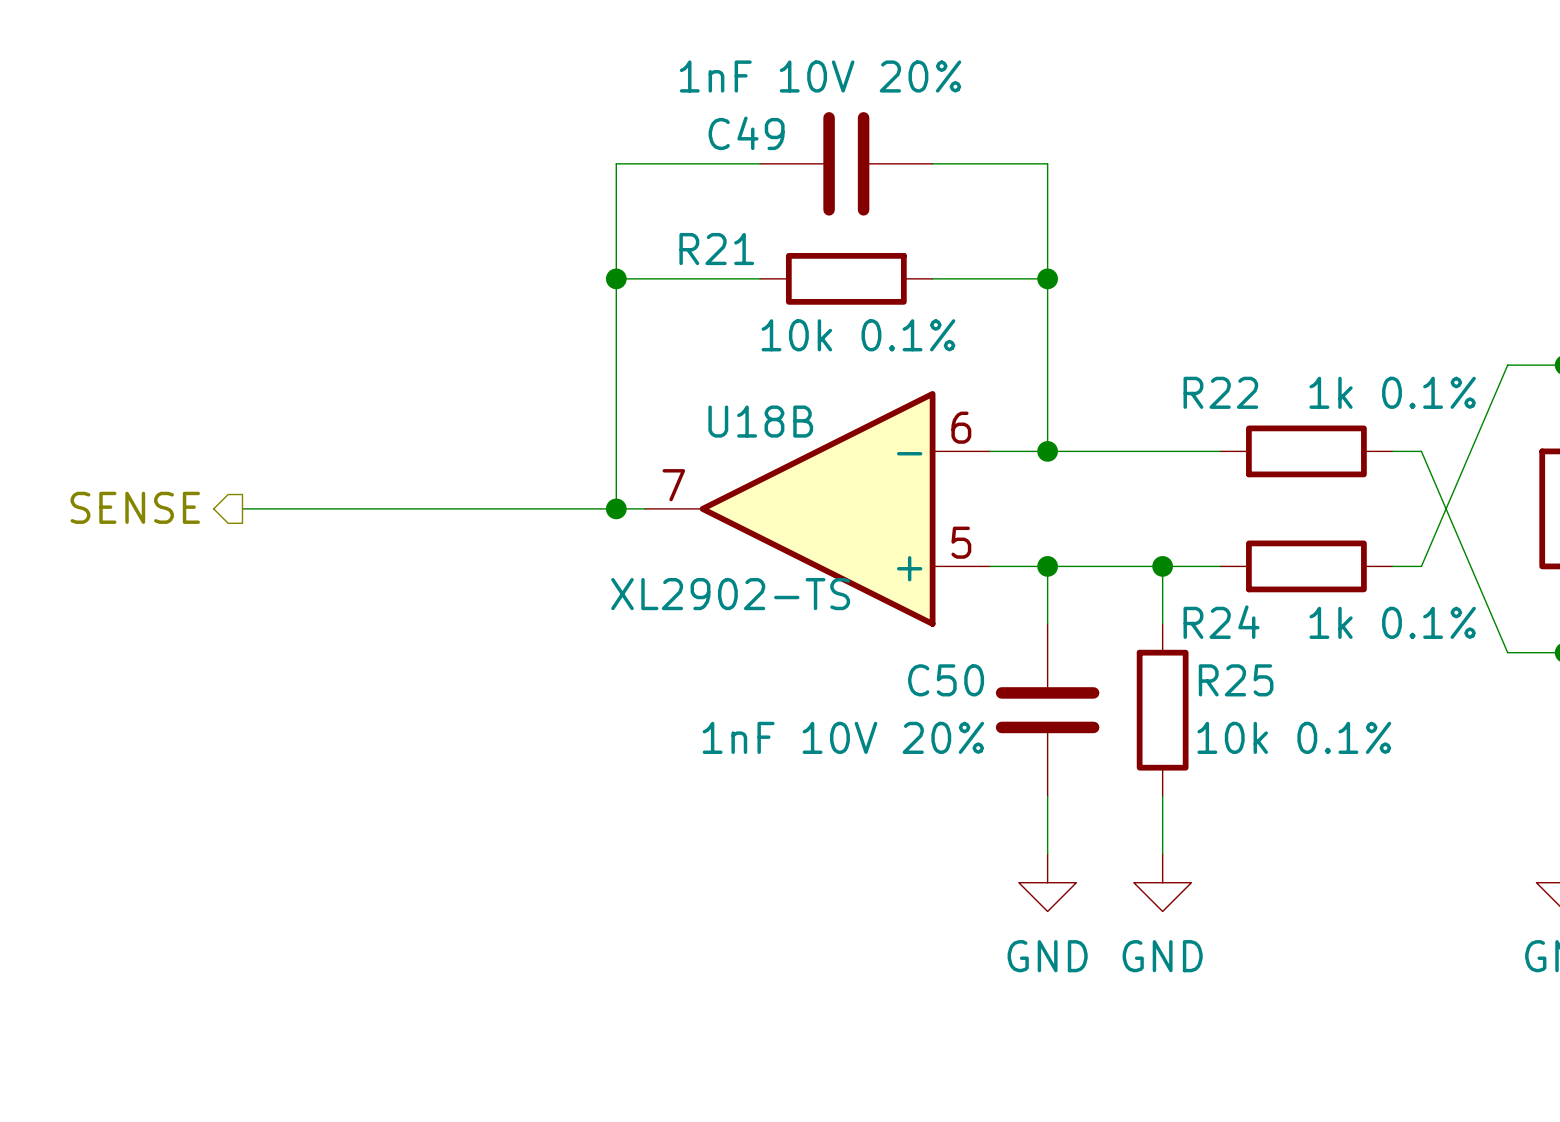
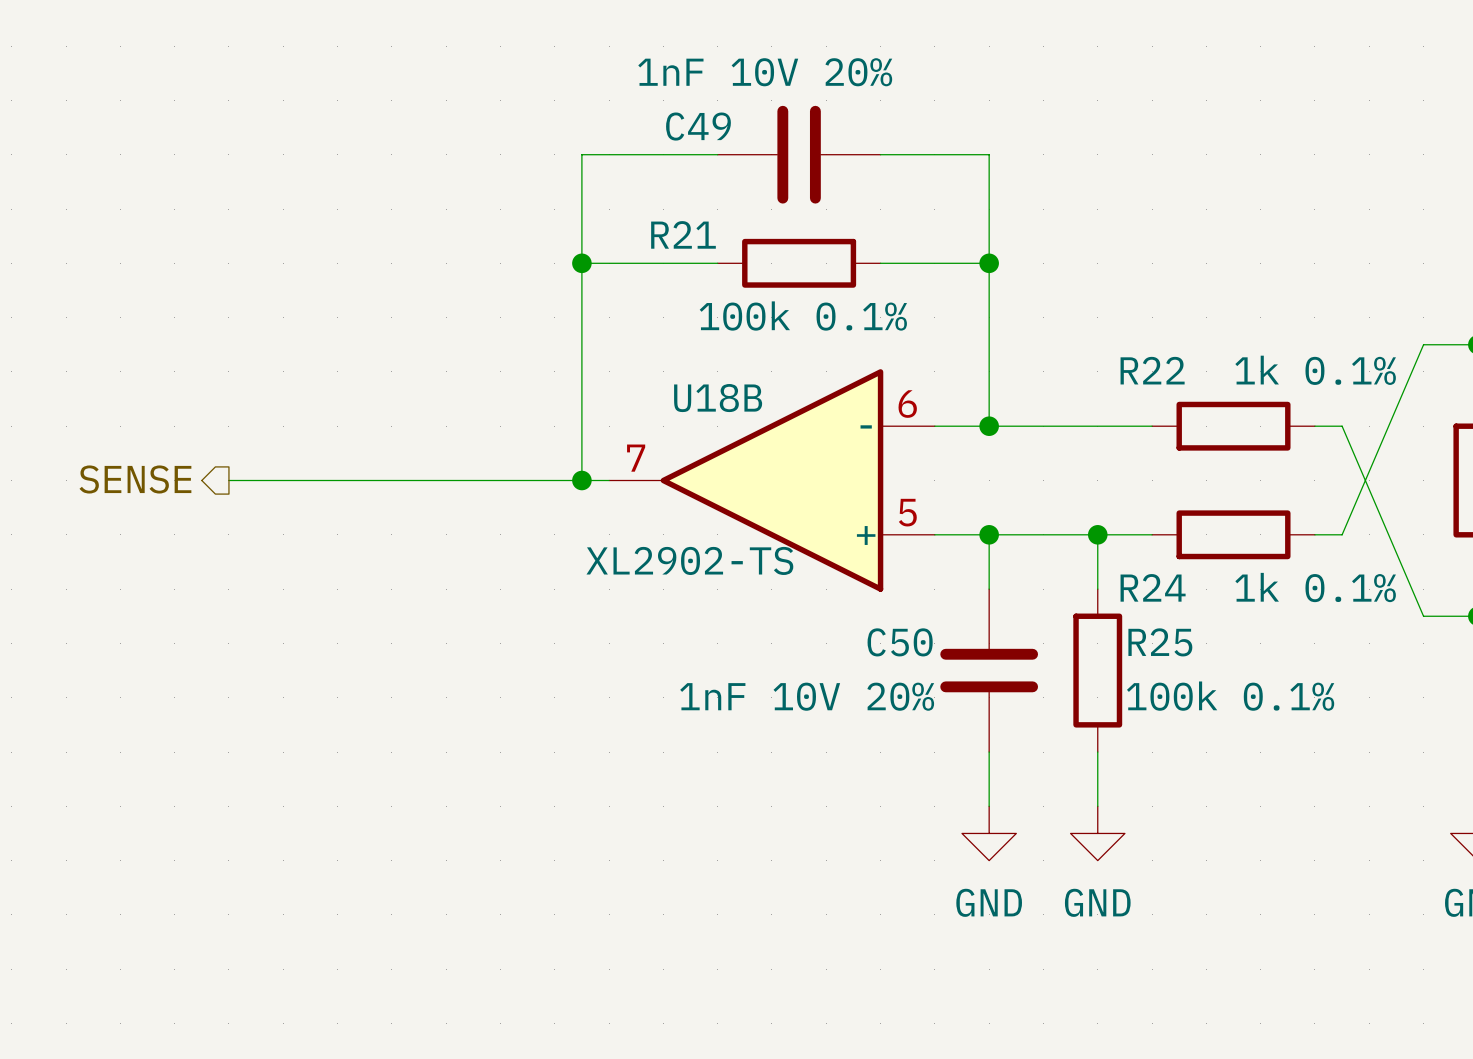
R21 value: 10k 0.1% (858, 335) -> 100k 0.1% (803, 316)
R25 value: 10k 0.1% (1294, 737) -> 100k 0.1% (1230, 696)

